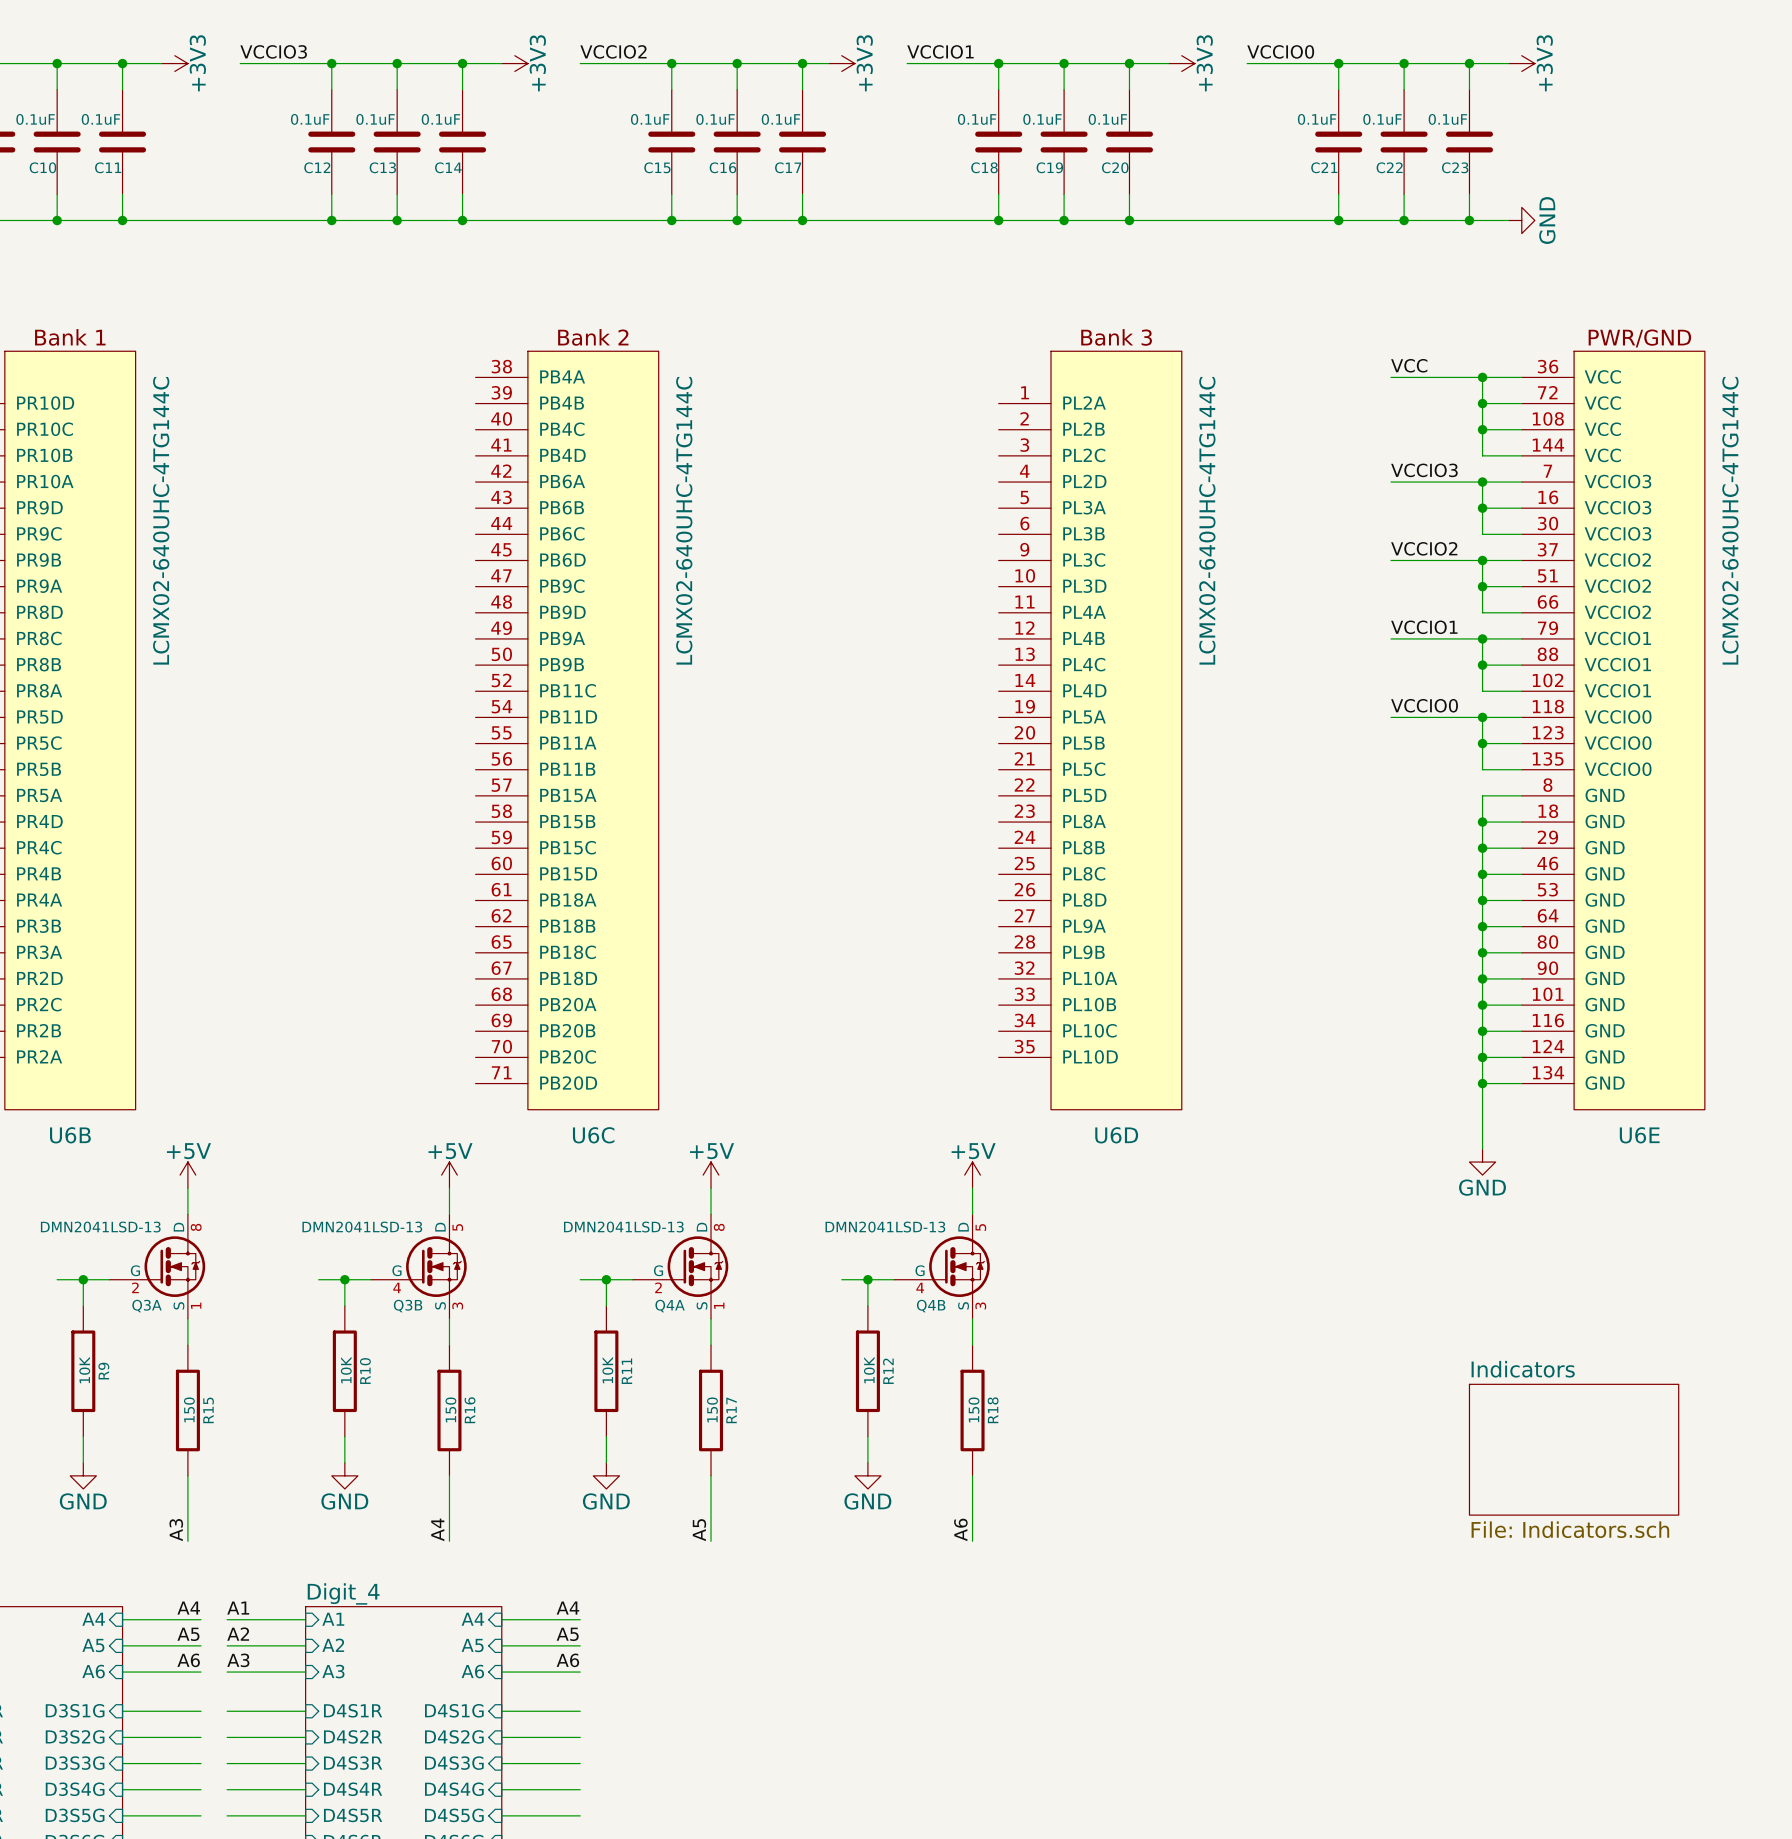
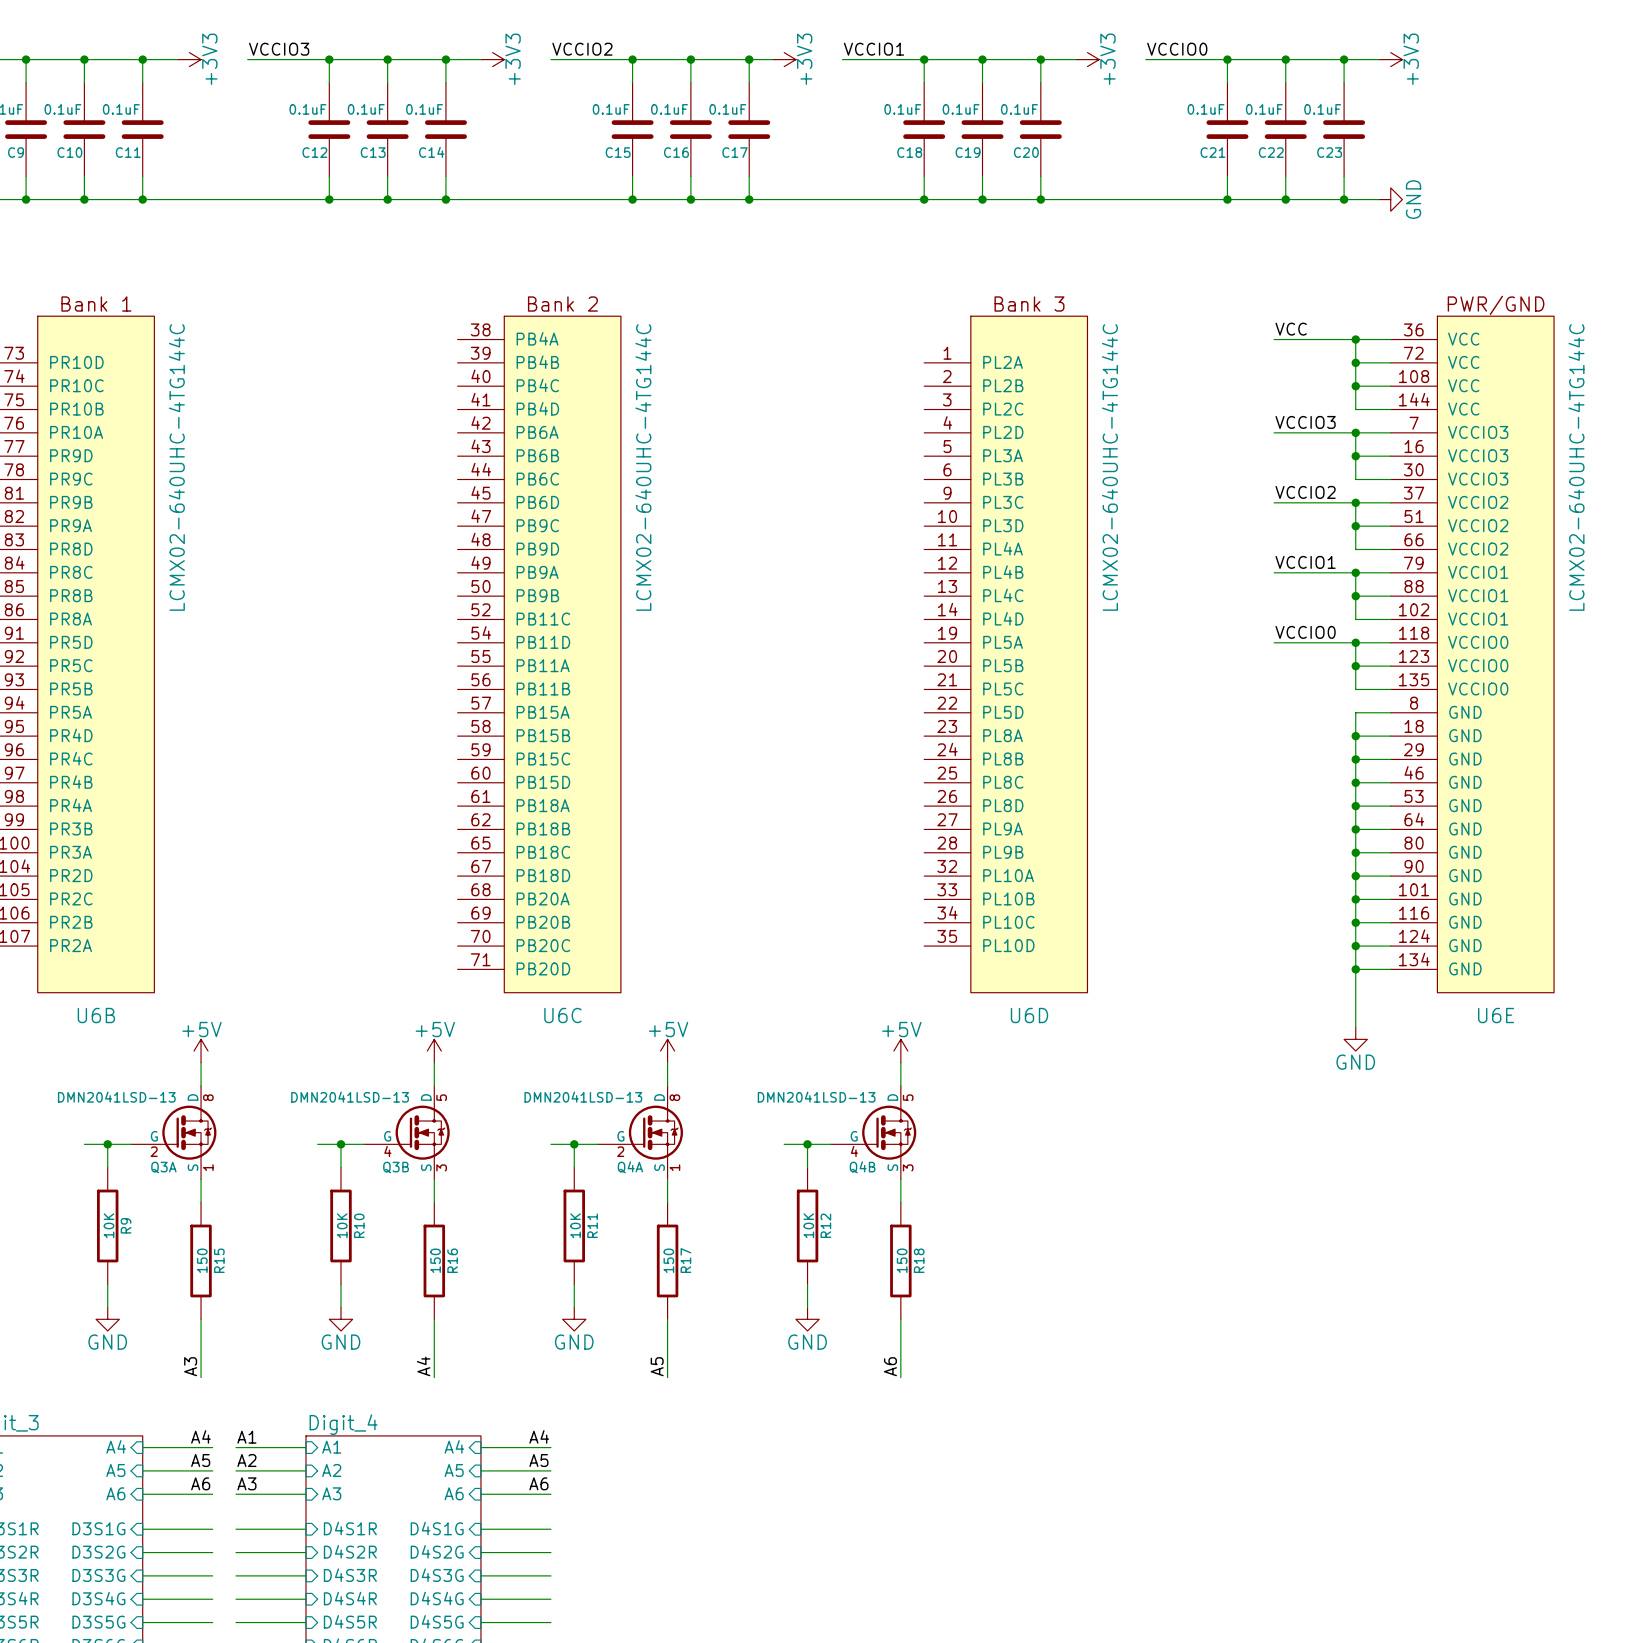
sheet Indicators: File: Indicators.sch (1574, 1449) -> none

